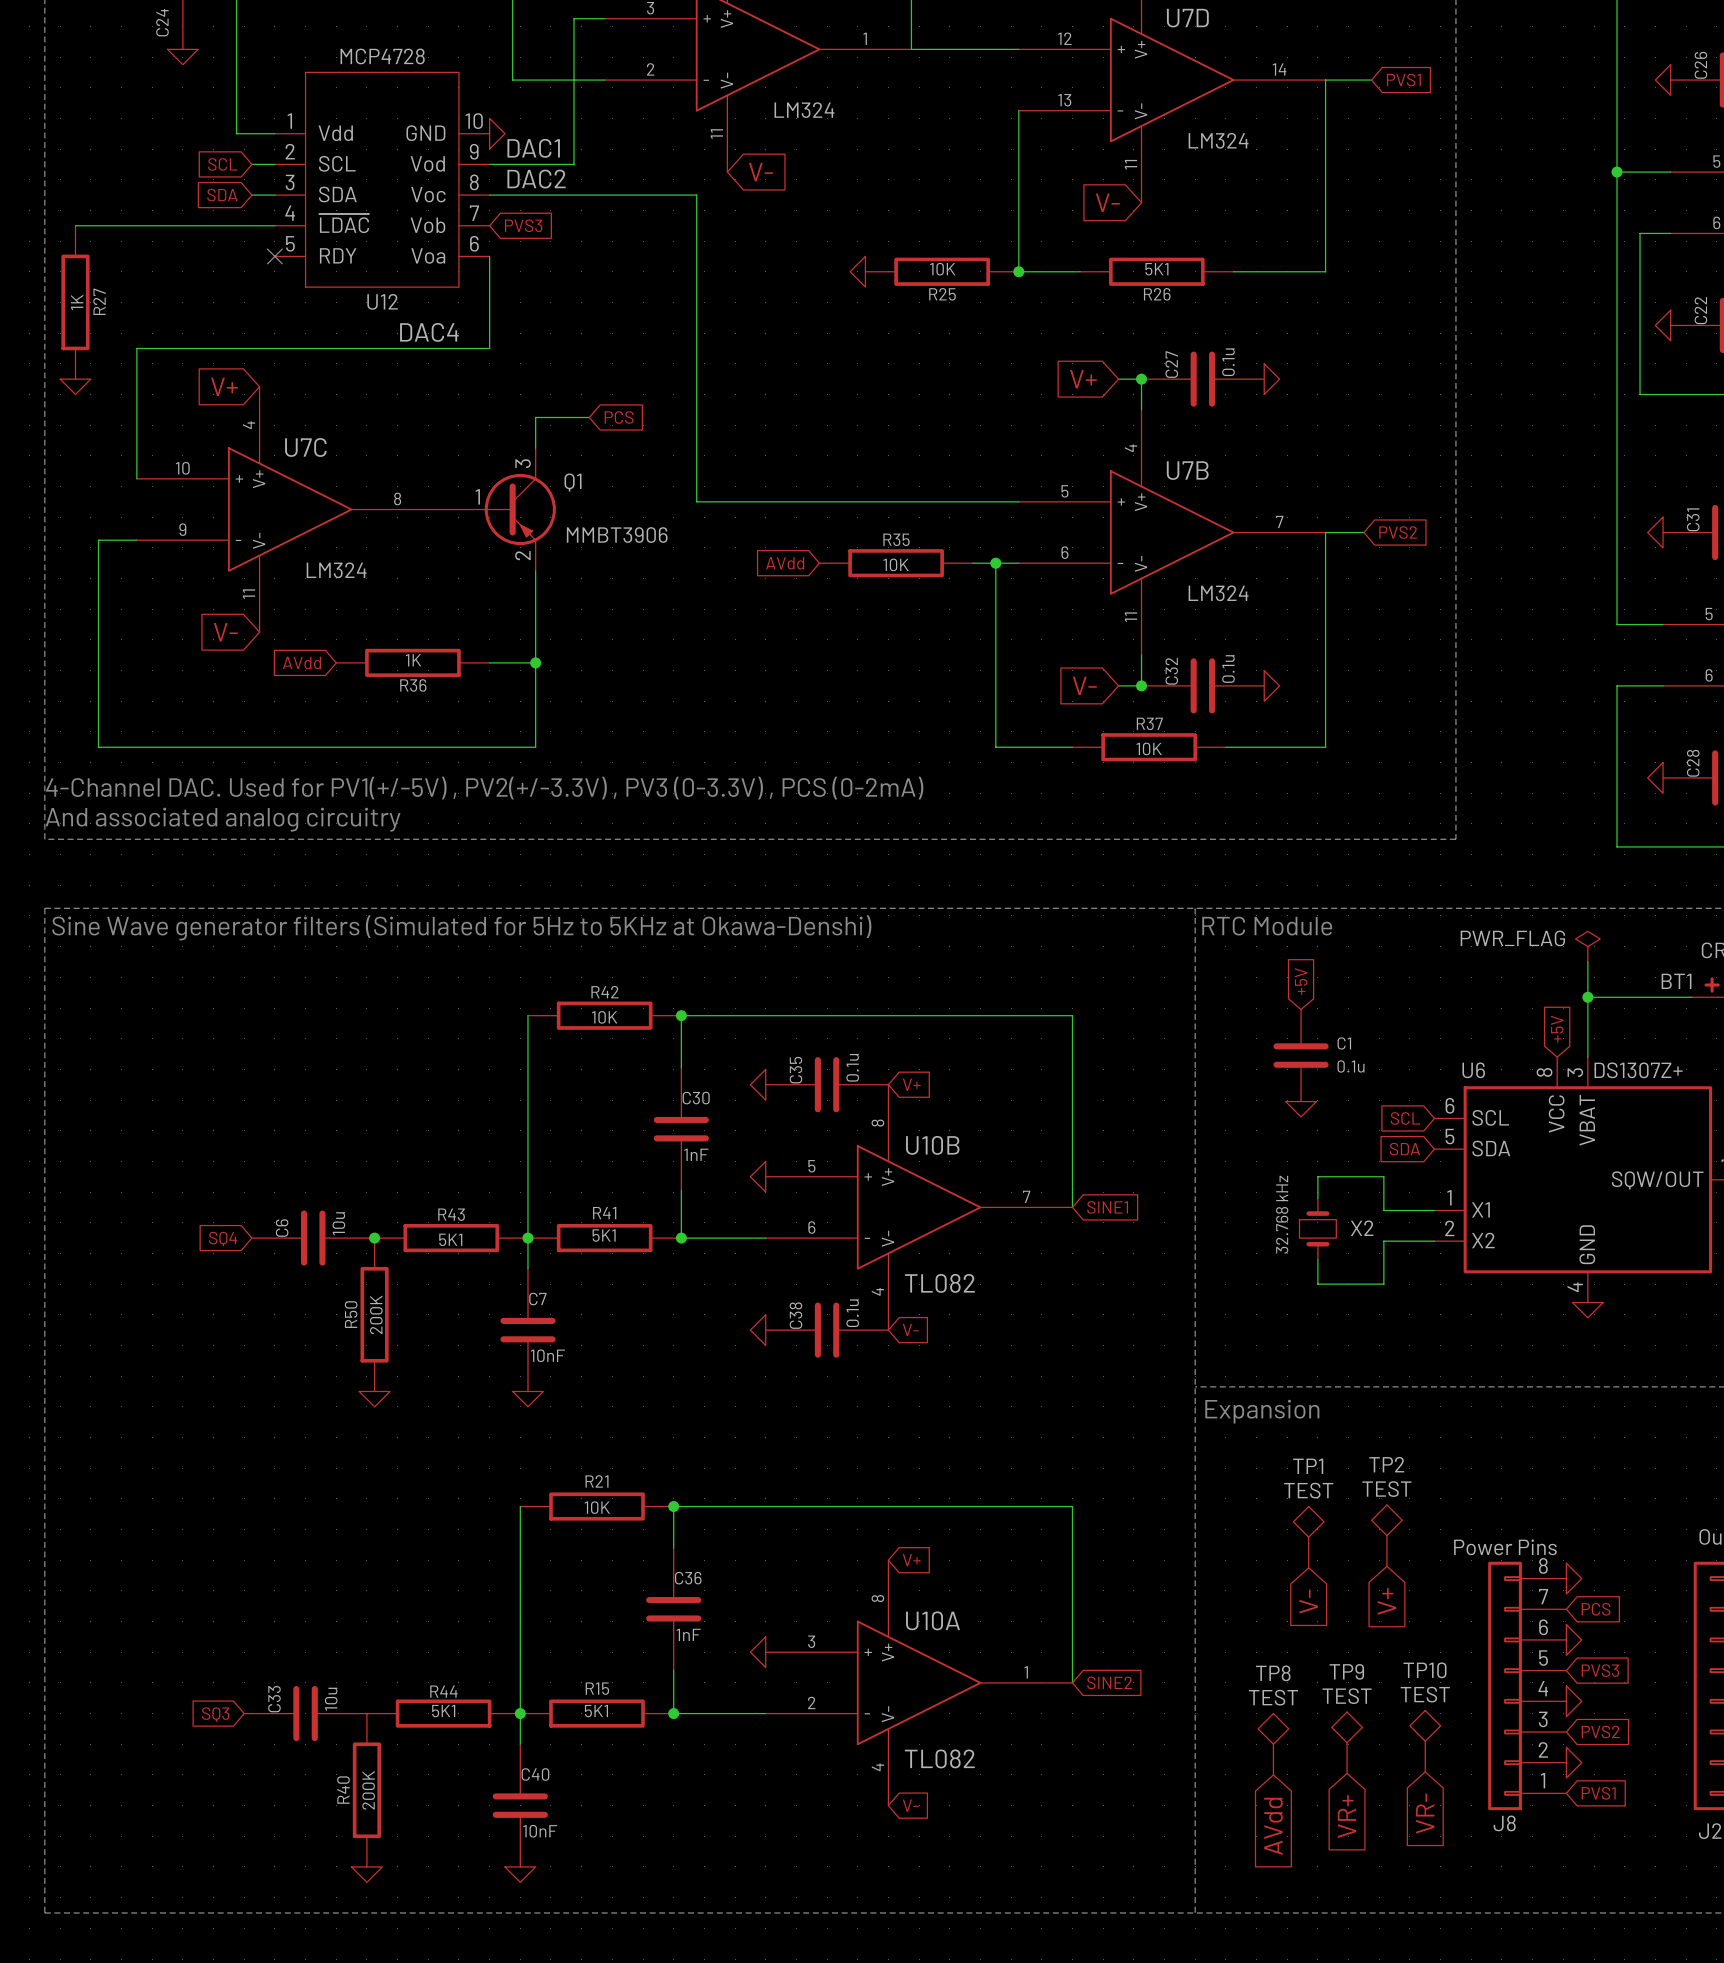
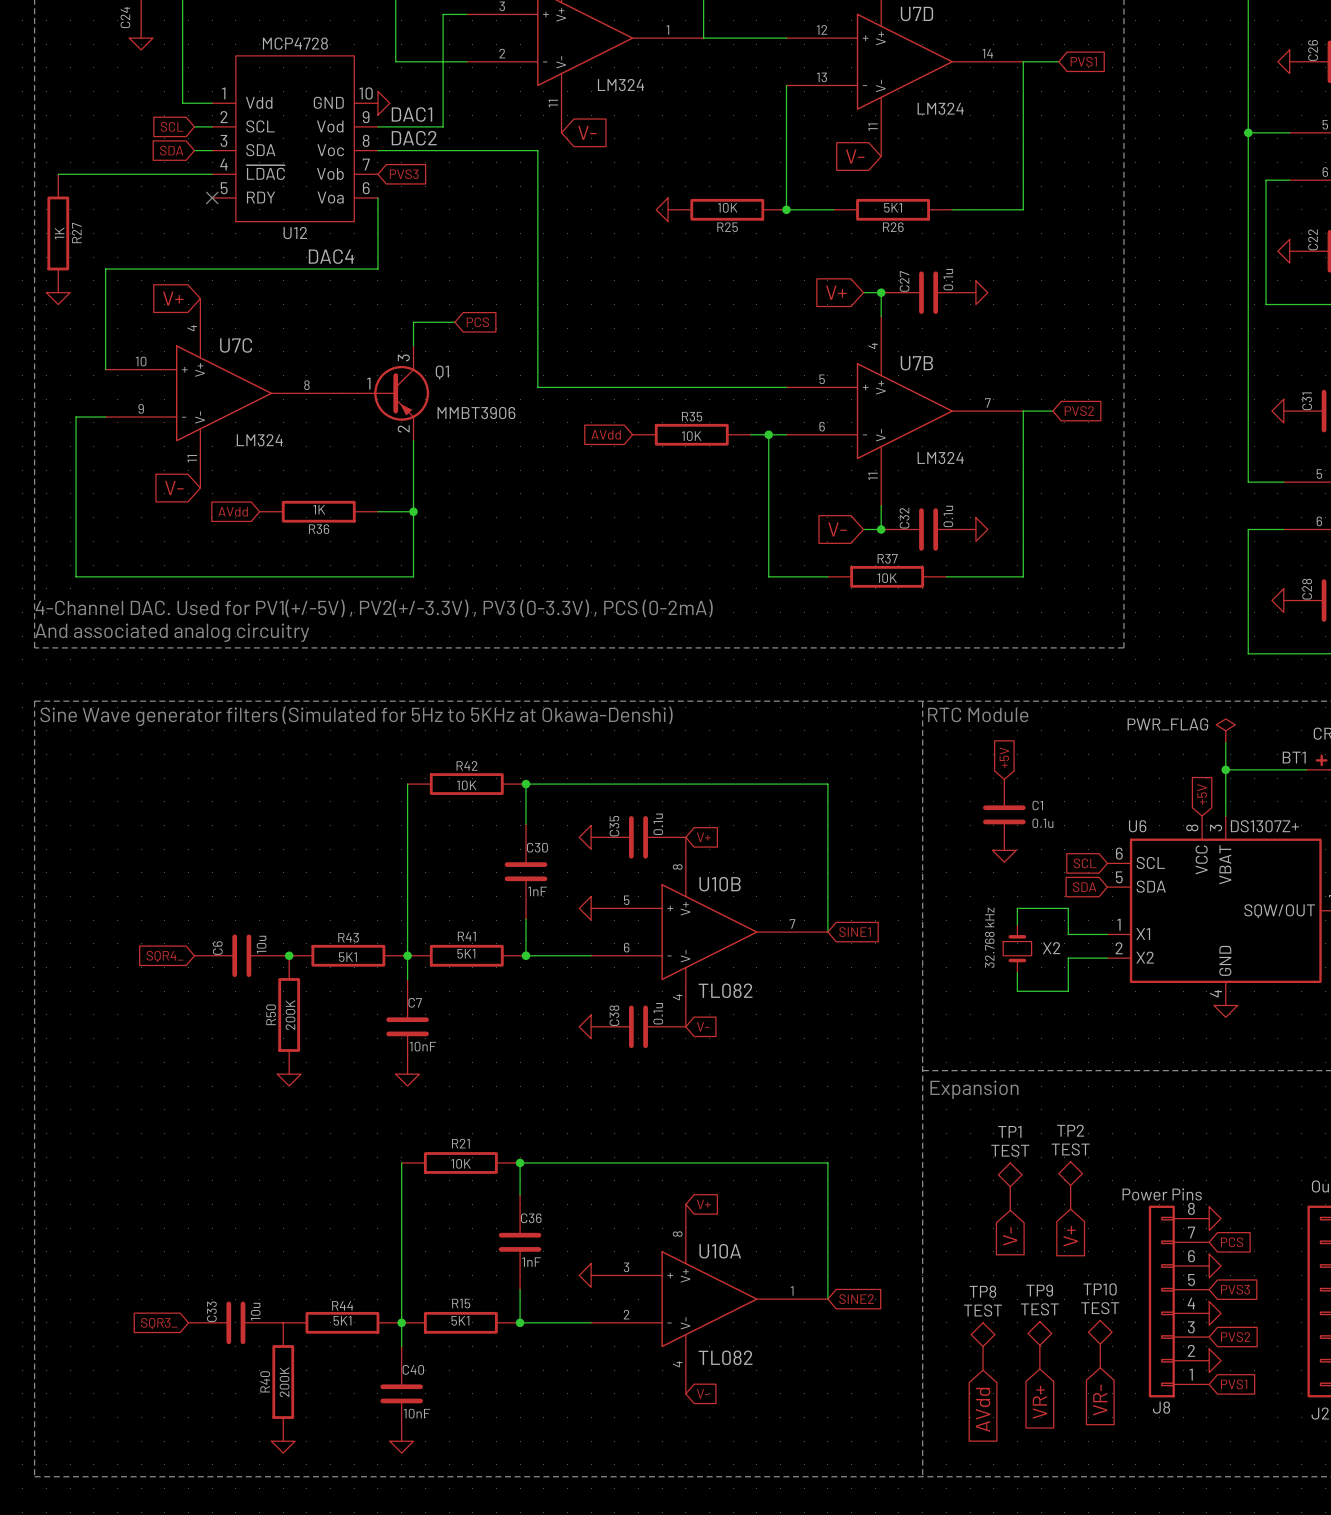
global label: SQ4 (223, 1239) -> SQR4_ (164, 956)
global label: SQ3 (215, 1714) -> SQR3_ (159, 1323)

